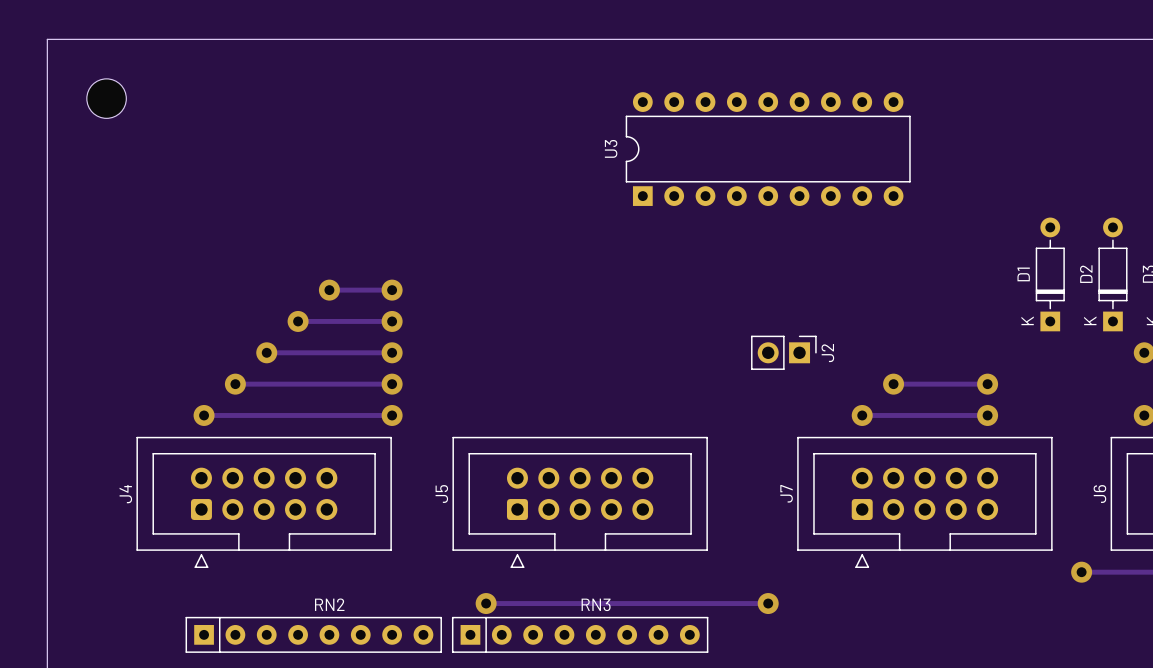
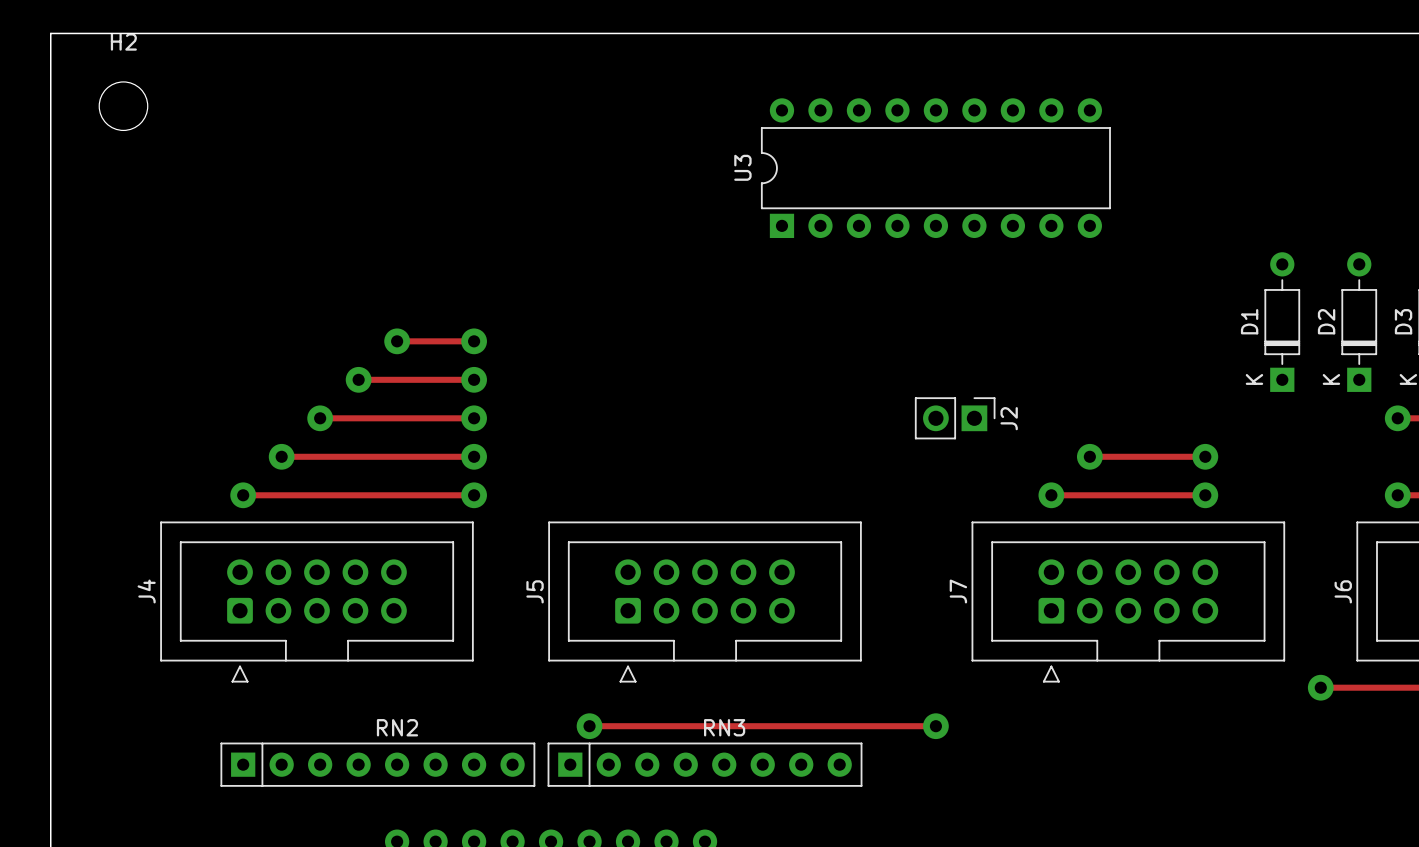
H2 name: none -> H2 (123, 41)

